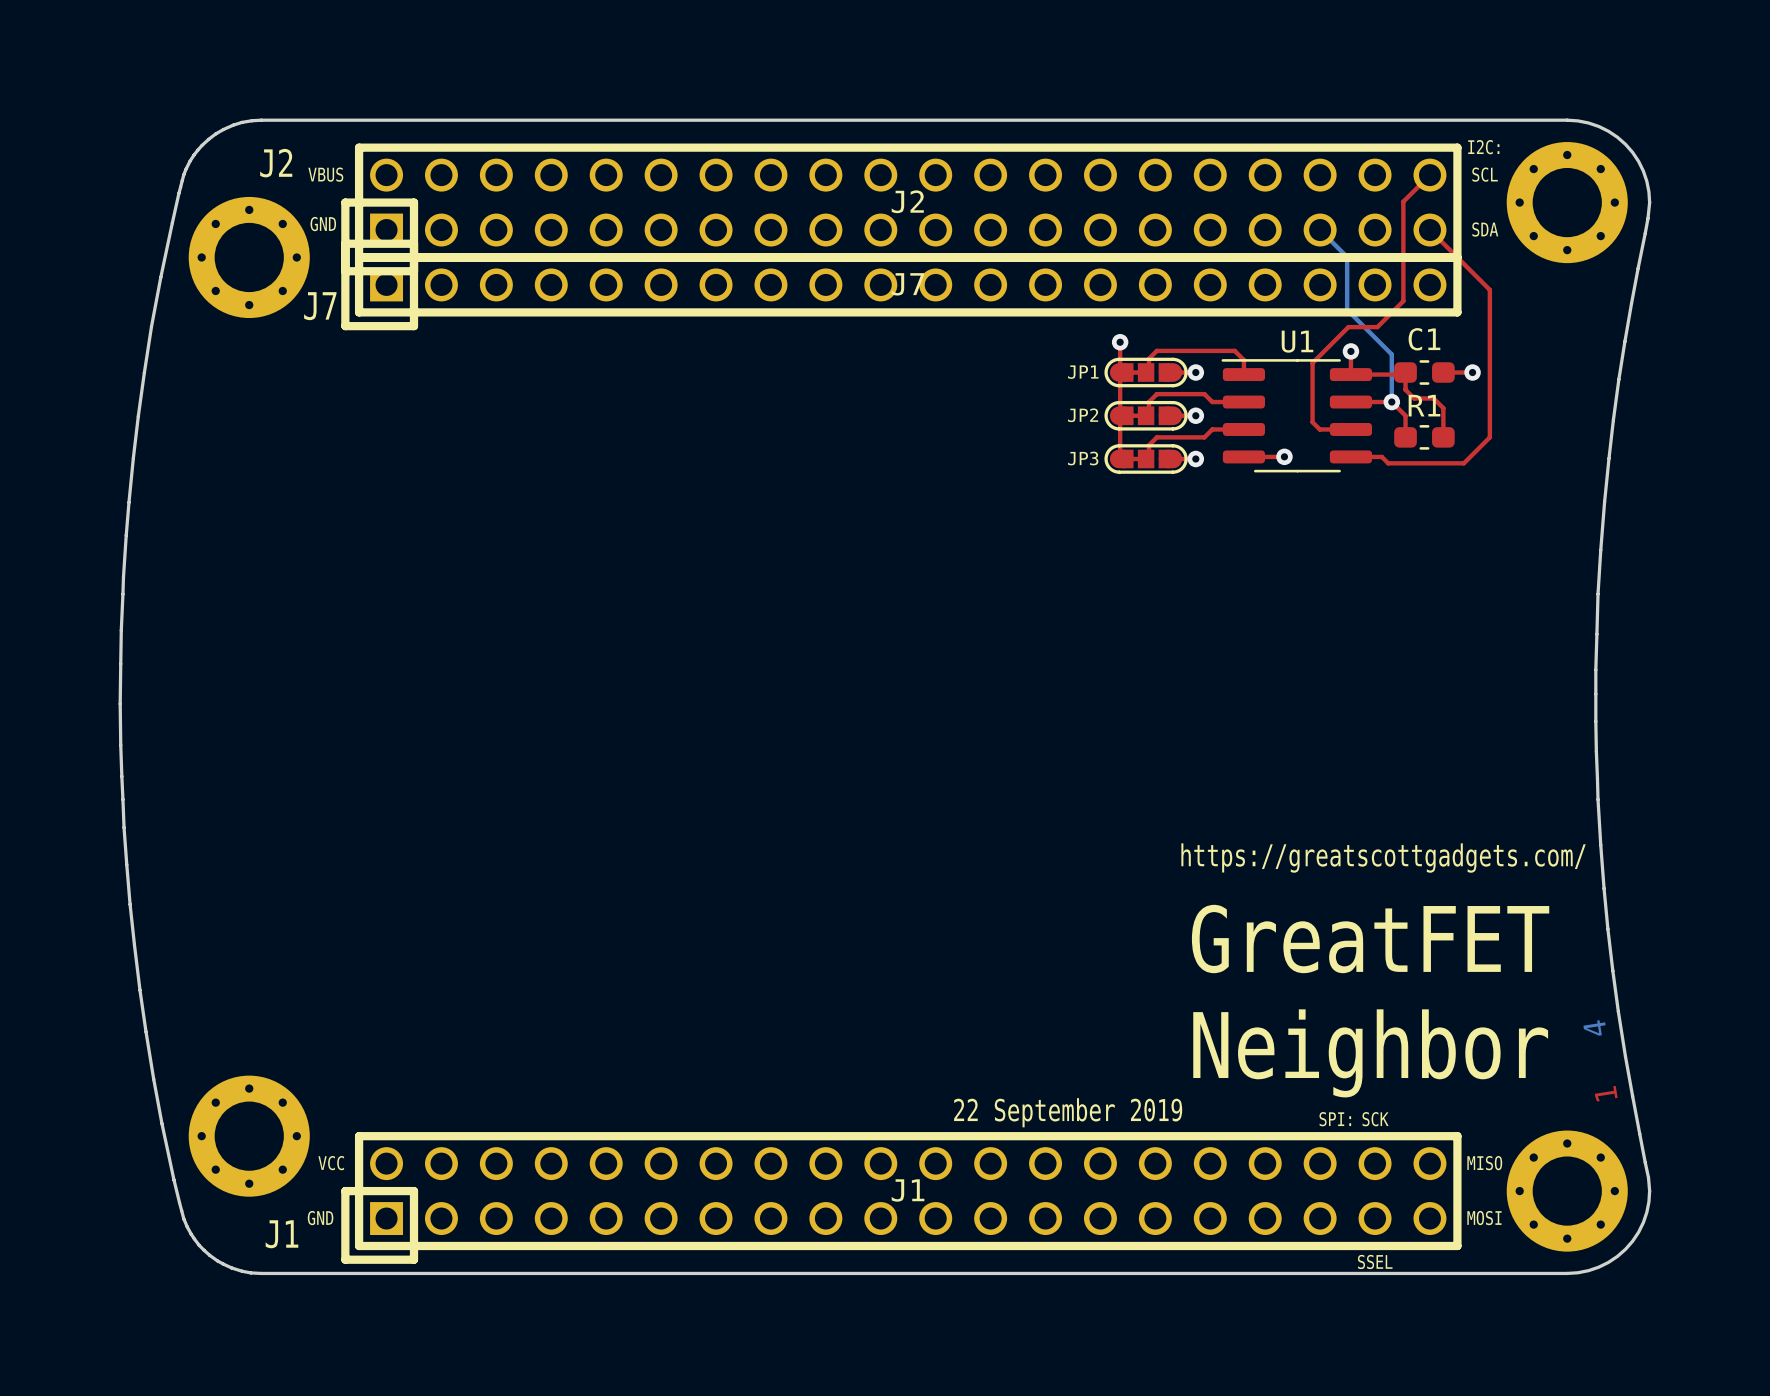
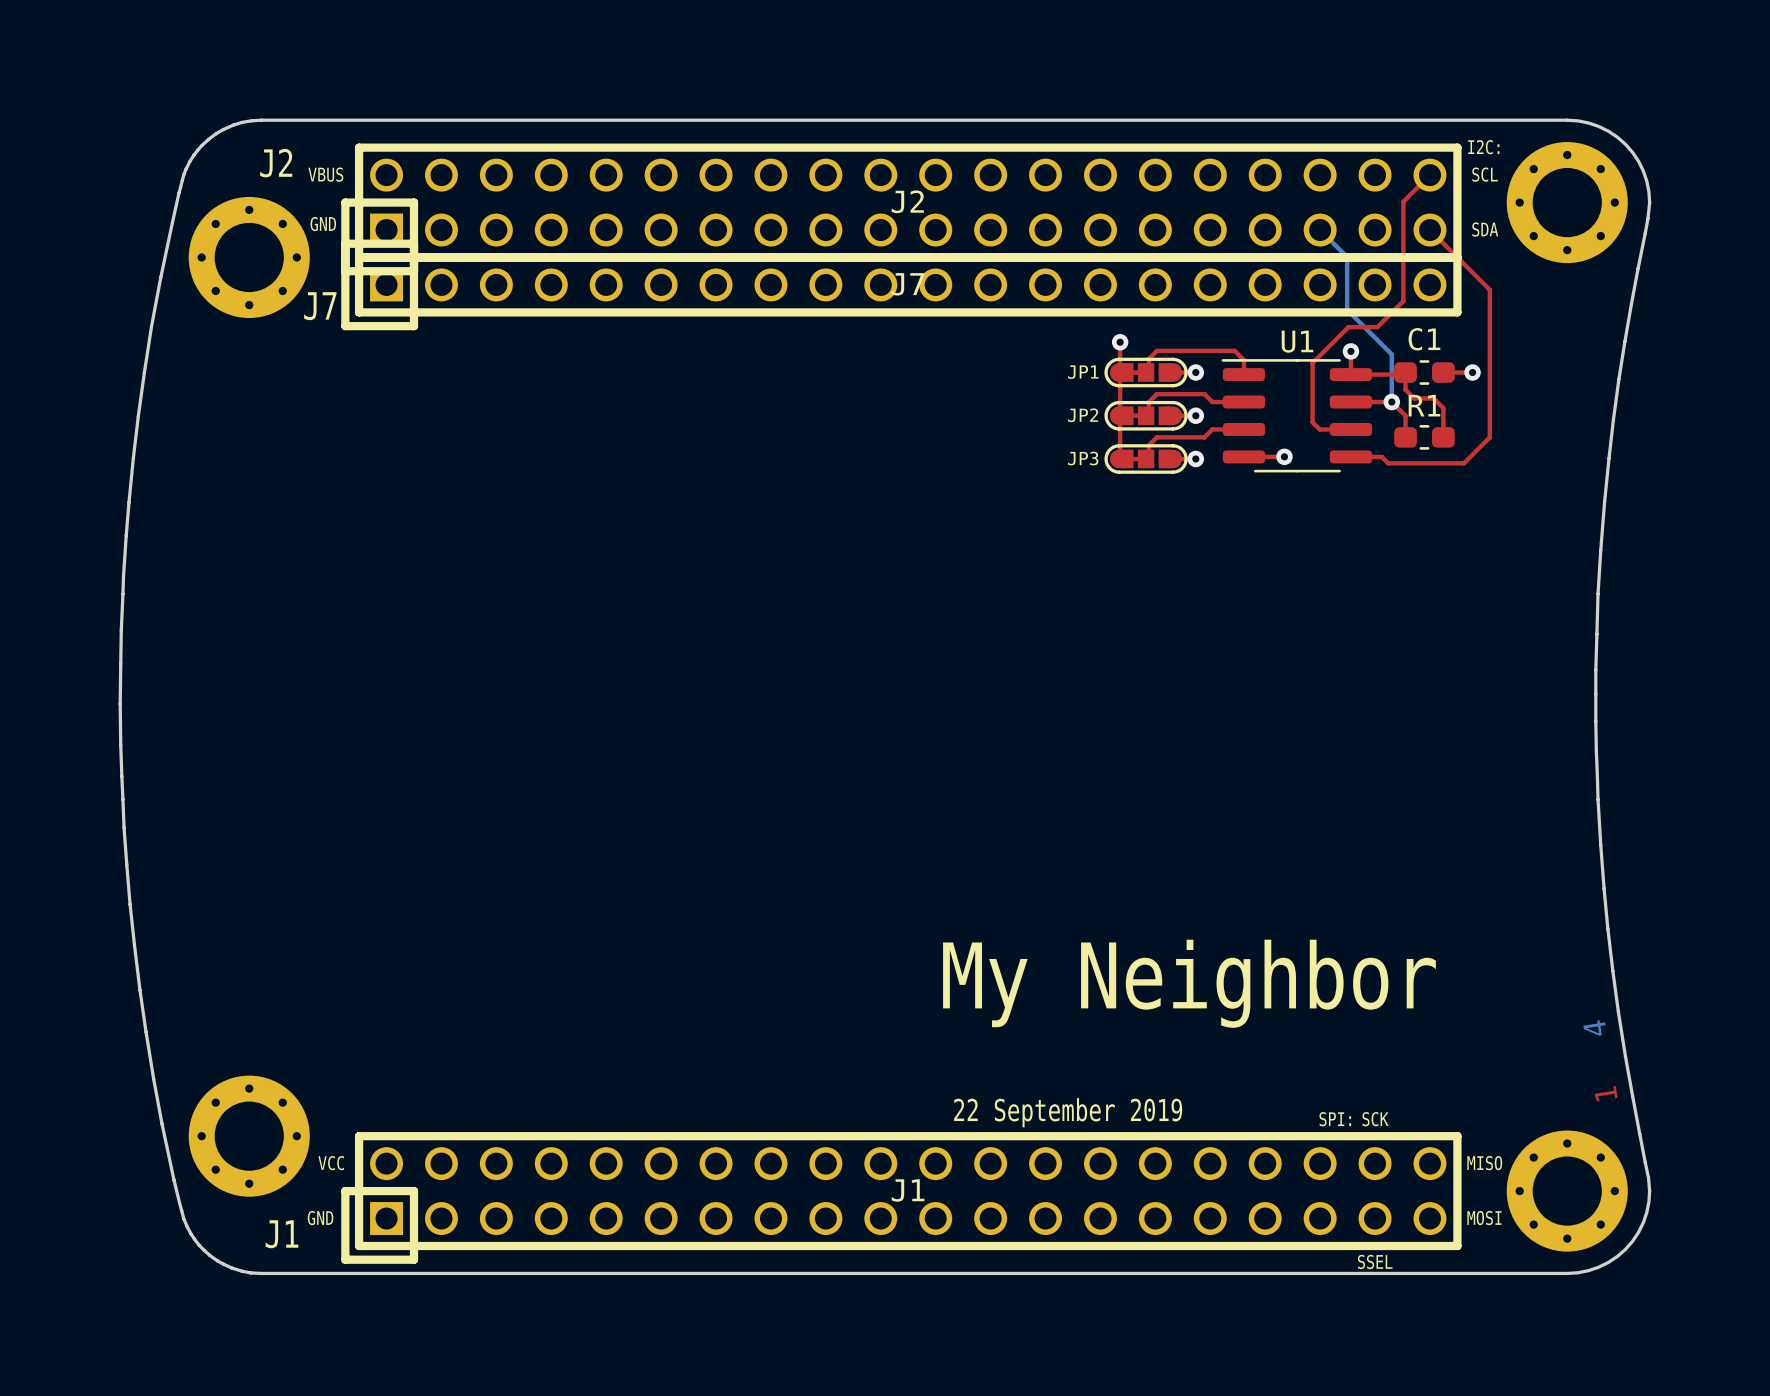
text: https://greatscottgadgets.com/ (1383, 858) -> none
text: GreatFET (1370, 939) -> none
text: Neighbor (1370, 1053) -> My Neighbor (1189, 983)

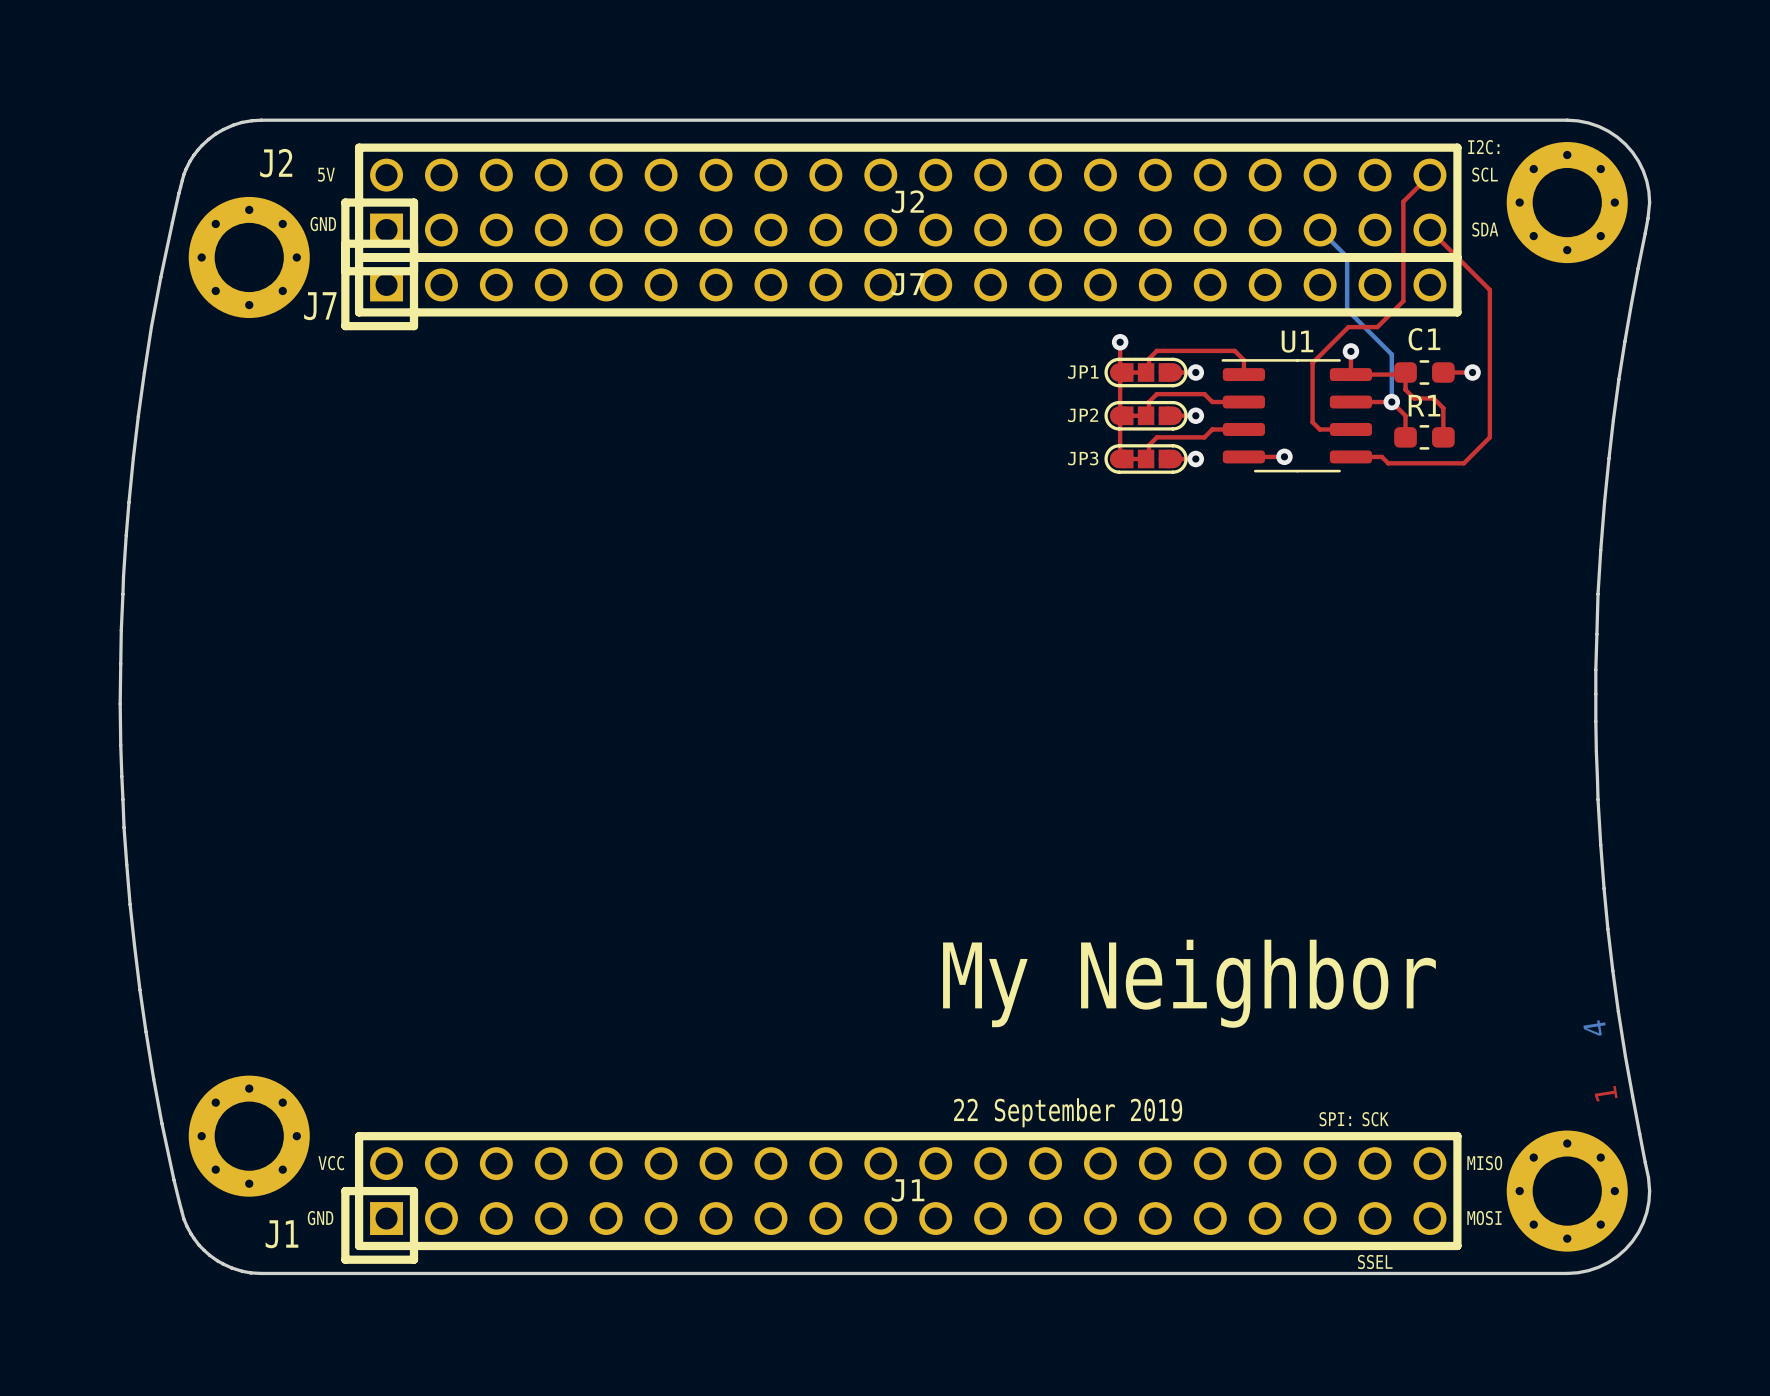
text: VBUS (325, 174) -> 5V (326, 174)

